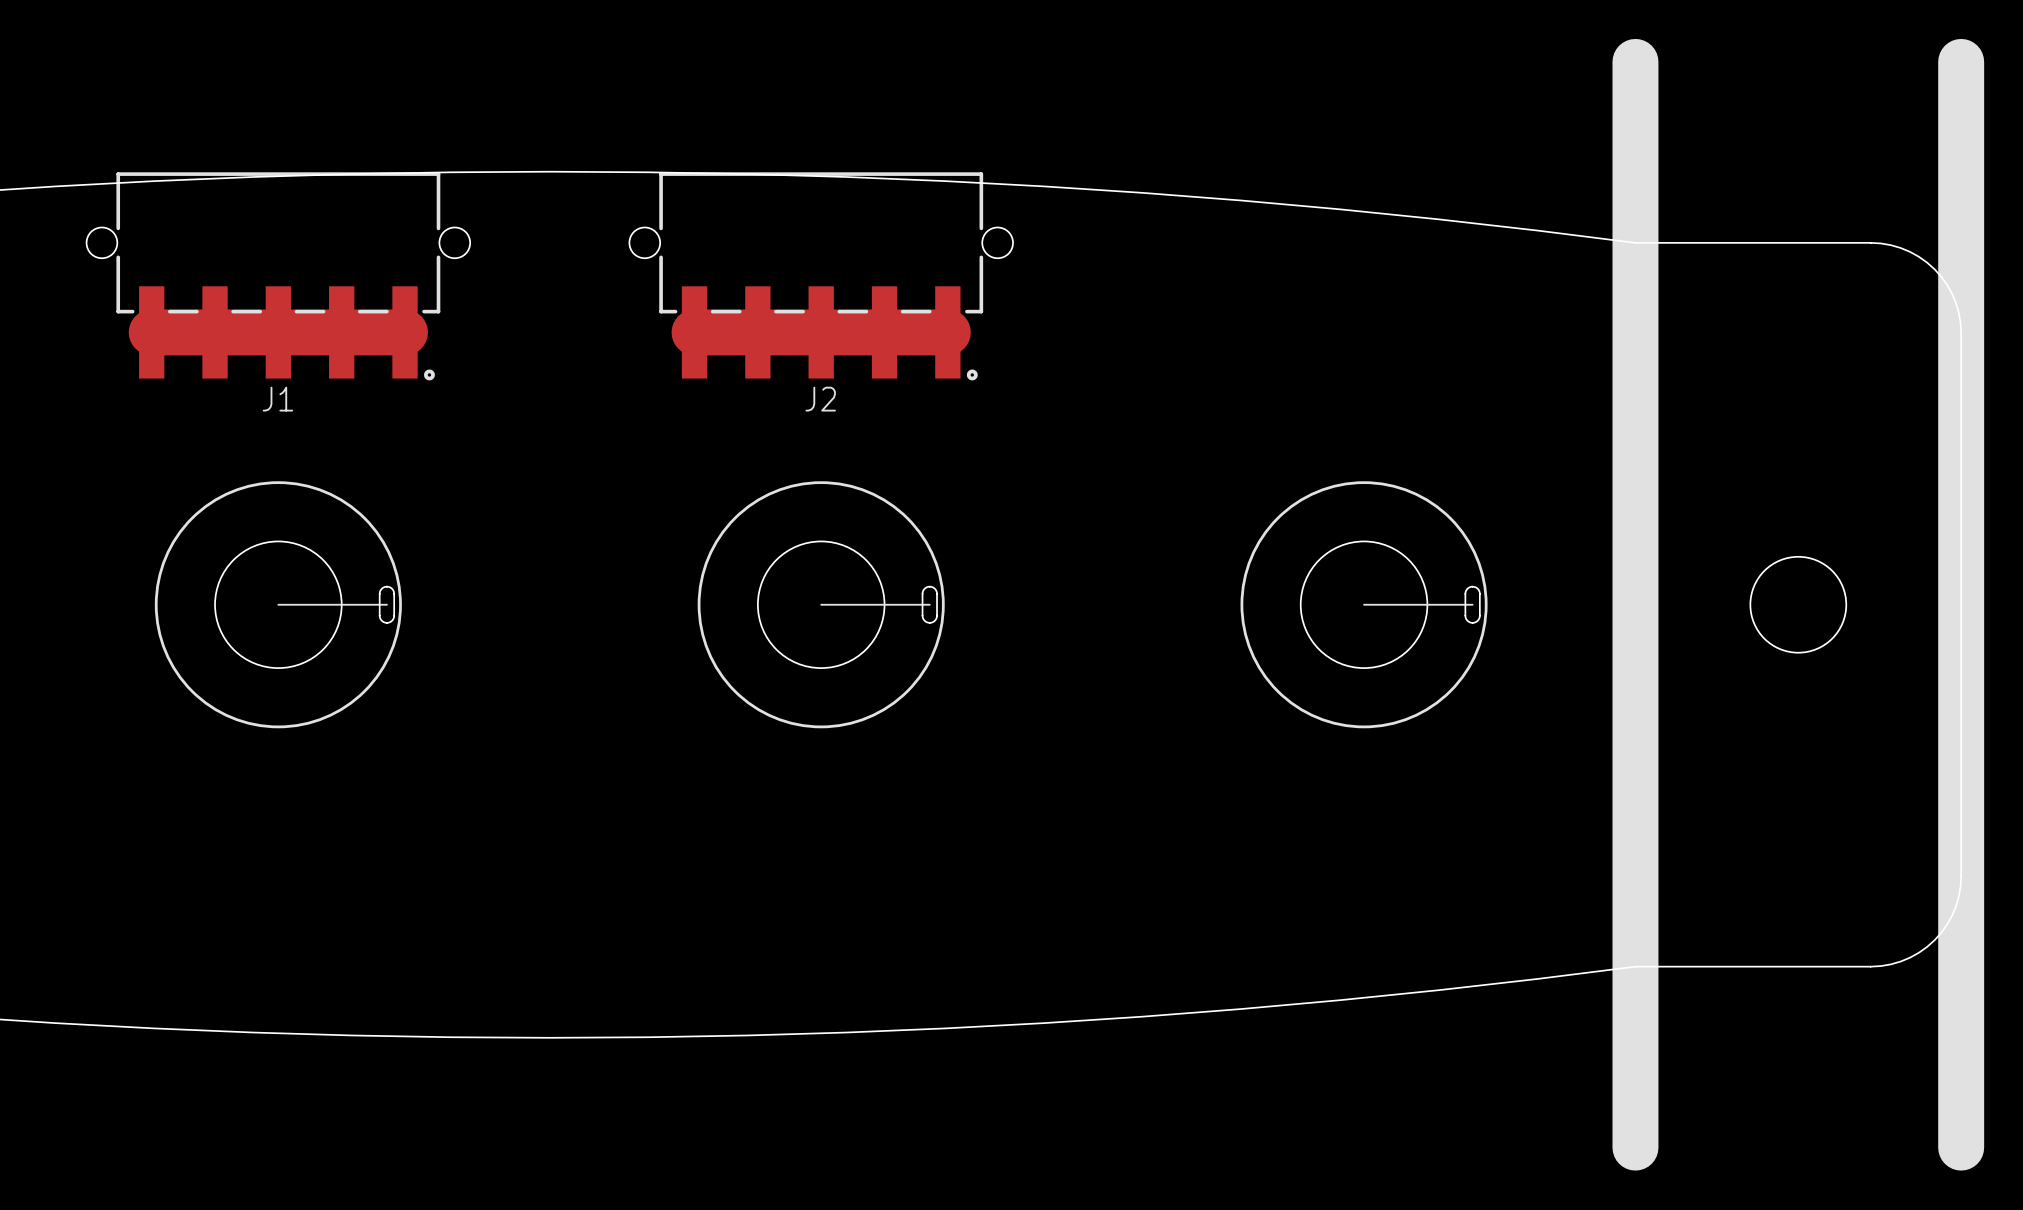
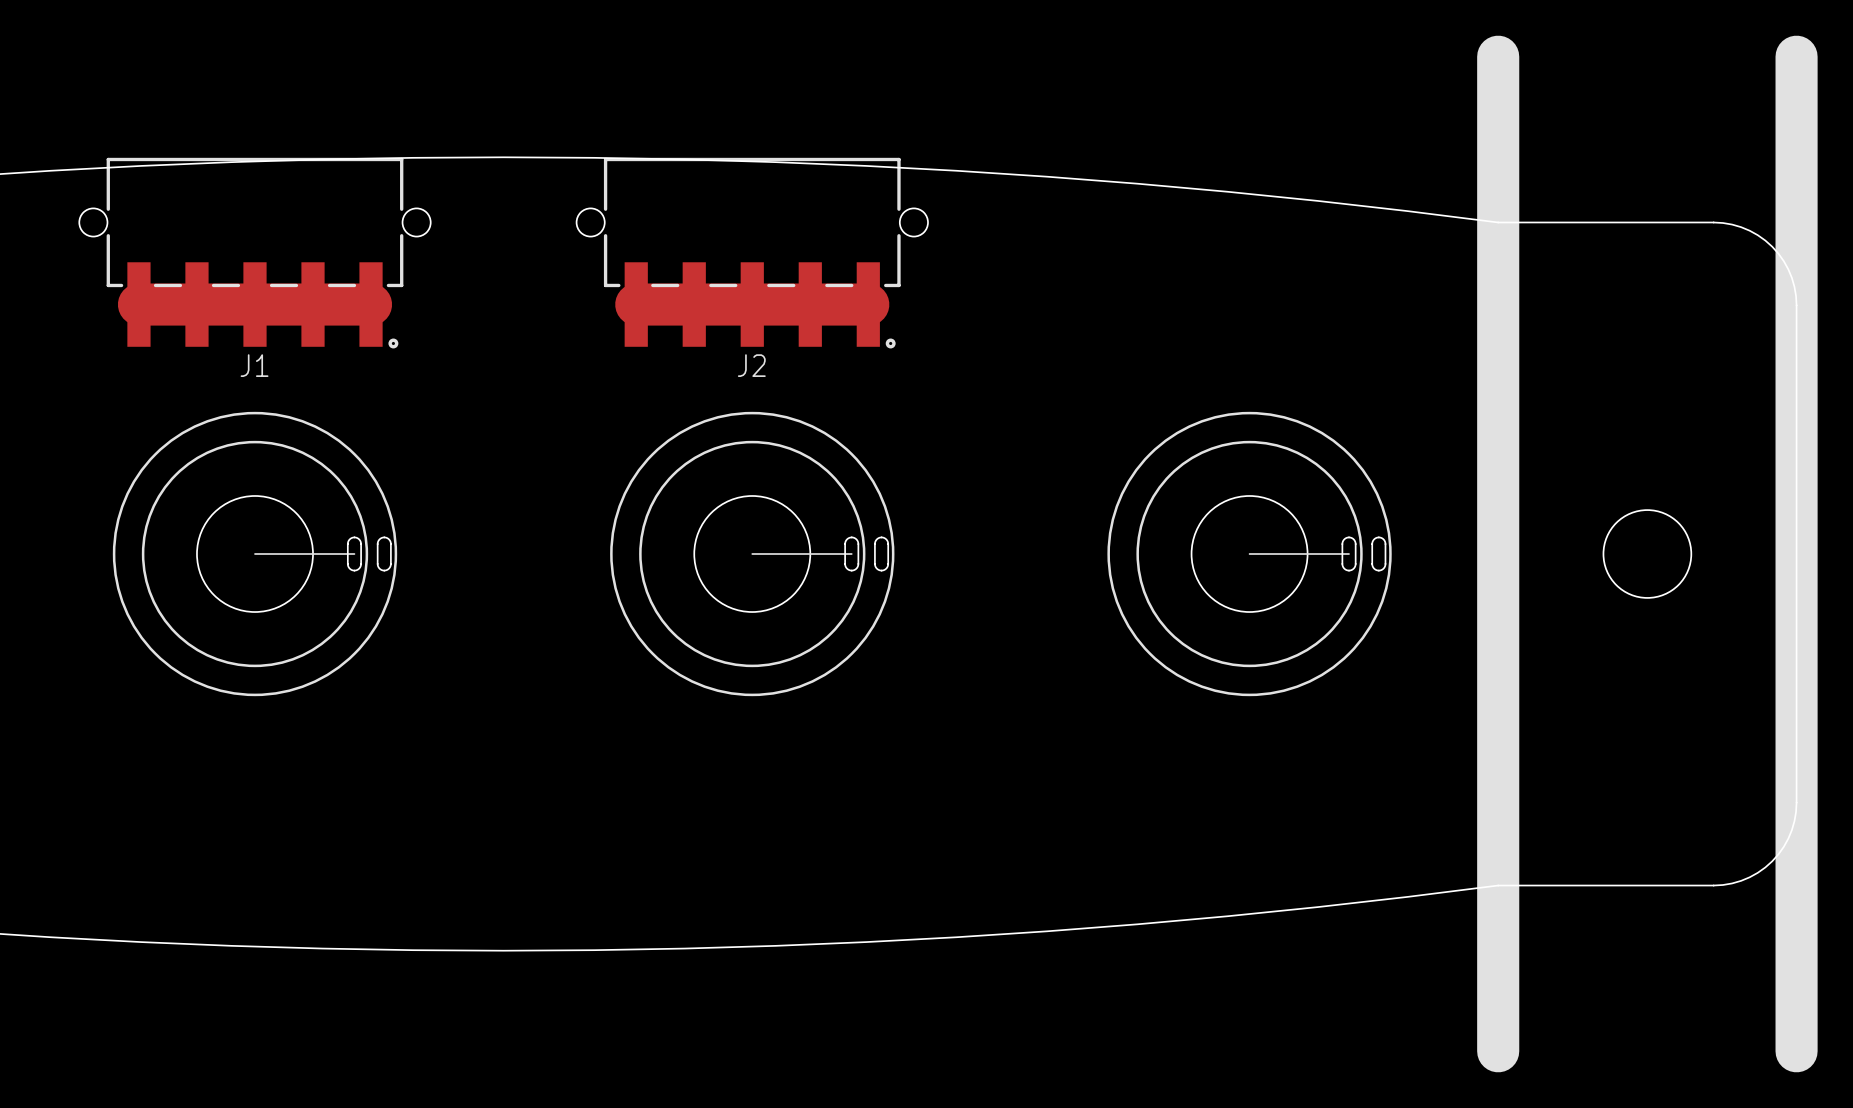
drawing: none -> [112, 411, 398, 697]
drawing: none -> [610, 411, 895, 697]
drawing: none -> [1107, 411, 1392, 697]
board edge: none -> (384, 537) (379, 539) (377, 544) (377, 565) (384, 570) (388, 568) (390, 563) (390, 542) (384, 537)
board edge: none -> (881, 537) (876, 539) (874, 544) (875, 565) (881, 570) (886, 568) (888, 563) (887, 542) (881, 537)
board edge: none -> (1378, 537) (1374, 539) (1372, 544) (1372, 565) (1378, 570) (1383, 568) (1385, 563) (1385, 542) (1378, 537)

